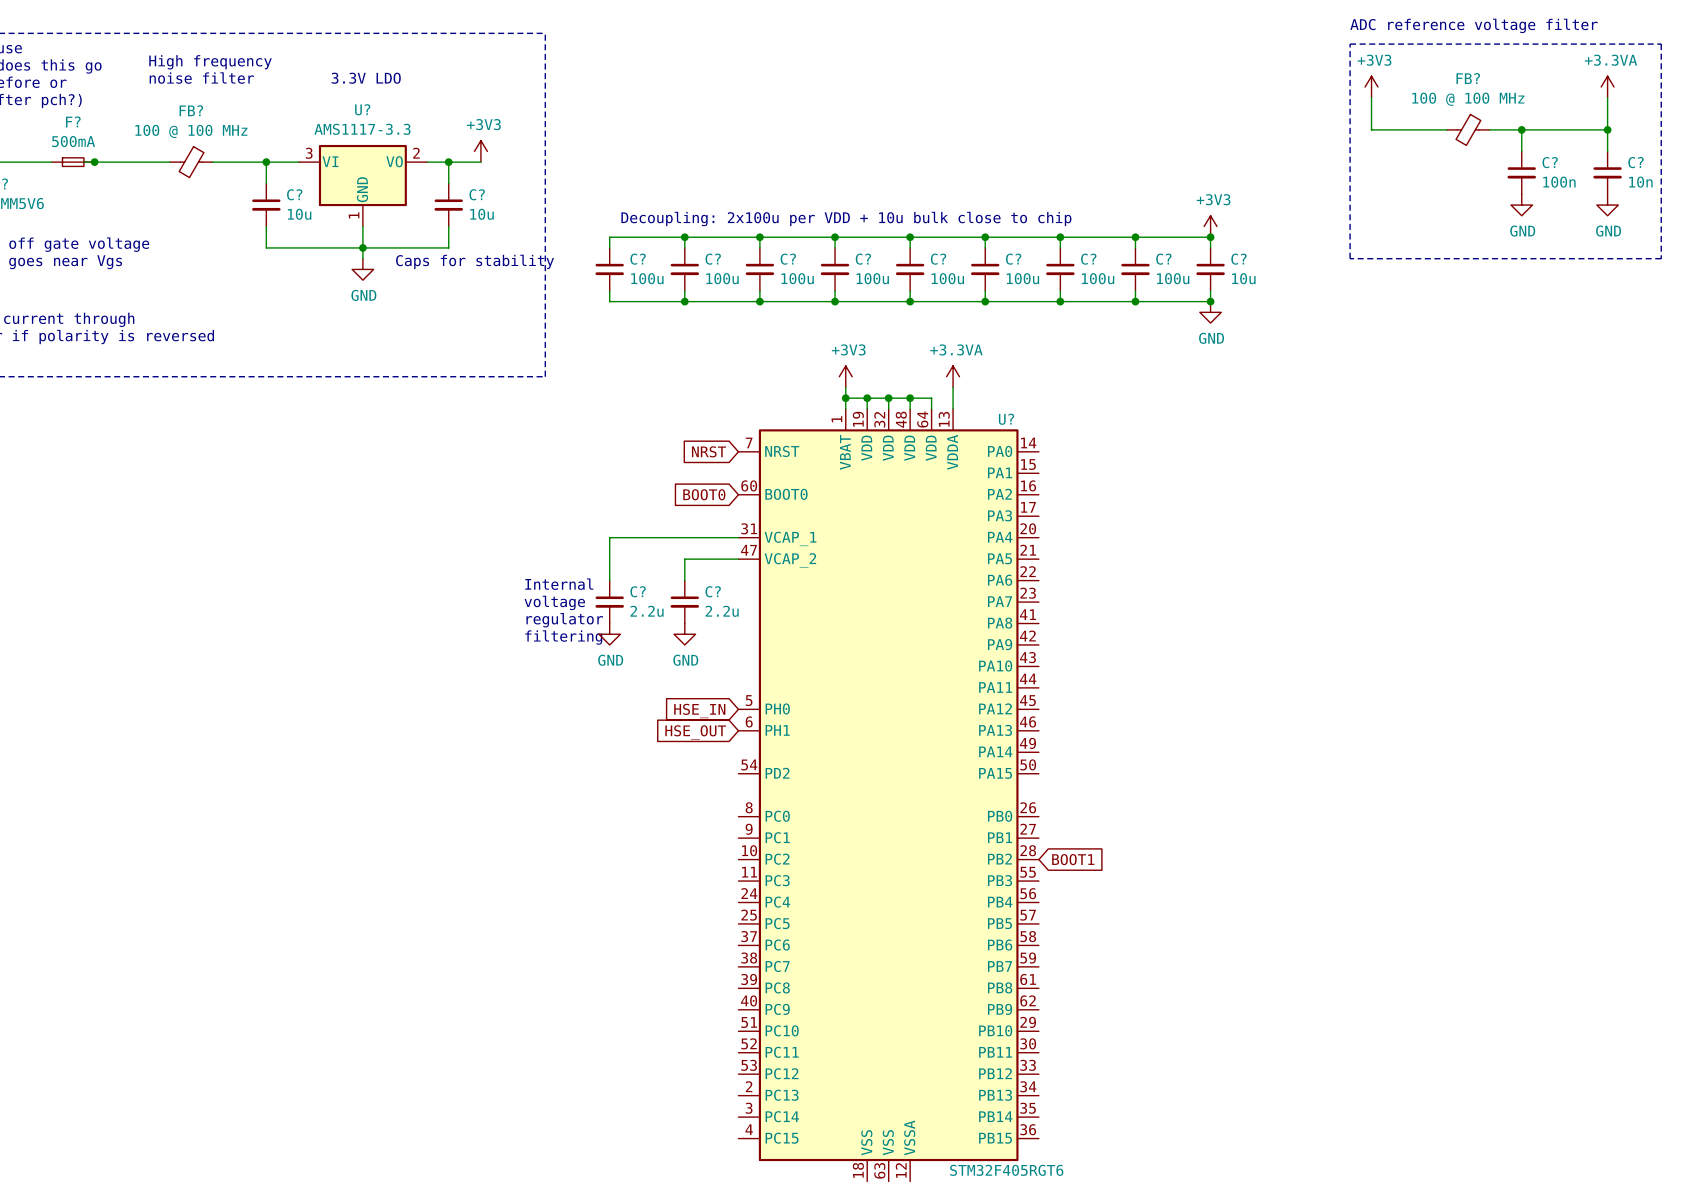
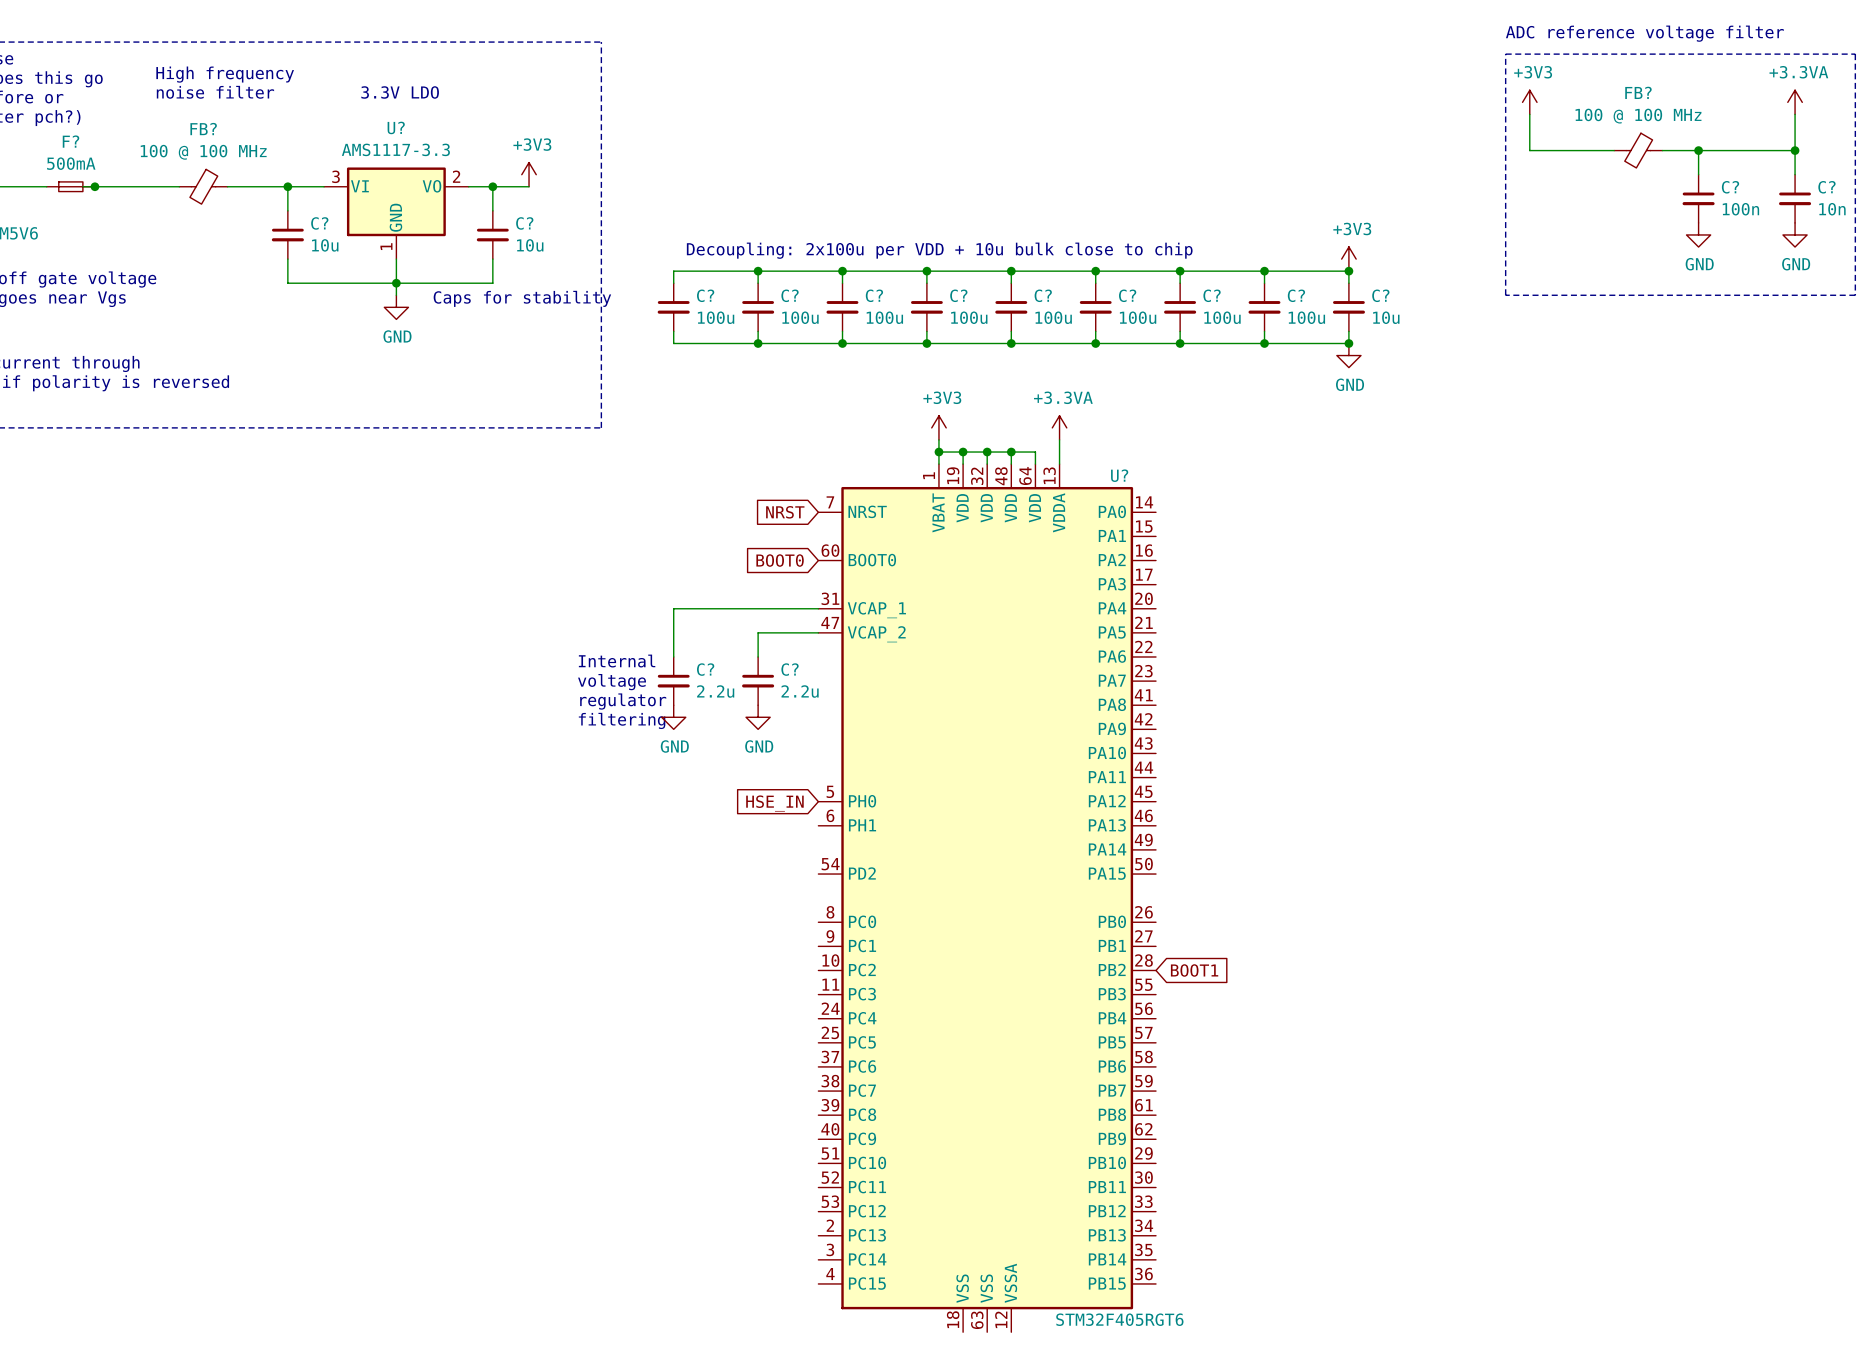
global label: HSE_OUT (695, 732) -> none

